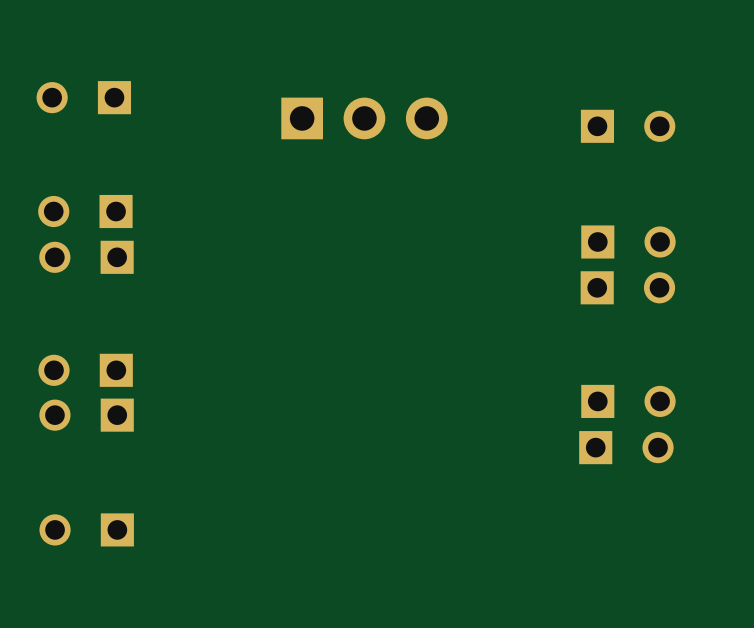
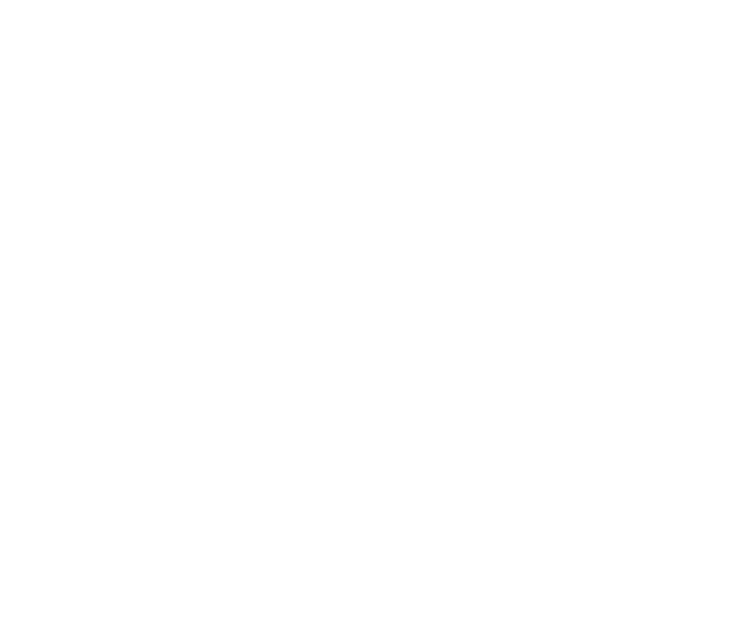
part: (83, 97) -> none
part: (364, 118) -> none
part: (628, 126) -> none
part: (85, 211) -> none
part: (628, 241) -> none
part: (86, 257) -> none
part: (627, 287) -> none
part: (85, 370) -> none
part: (628, 401) -> none
part: (86, 415) -> none
part: (626, 447) -> none
part: (86, 529) -> none

